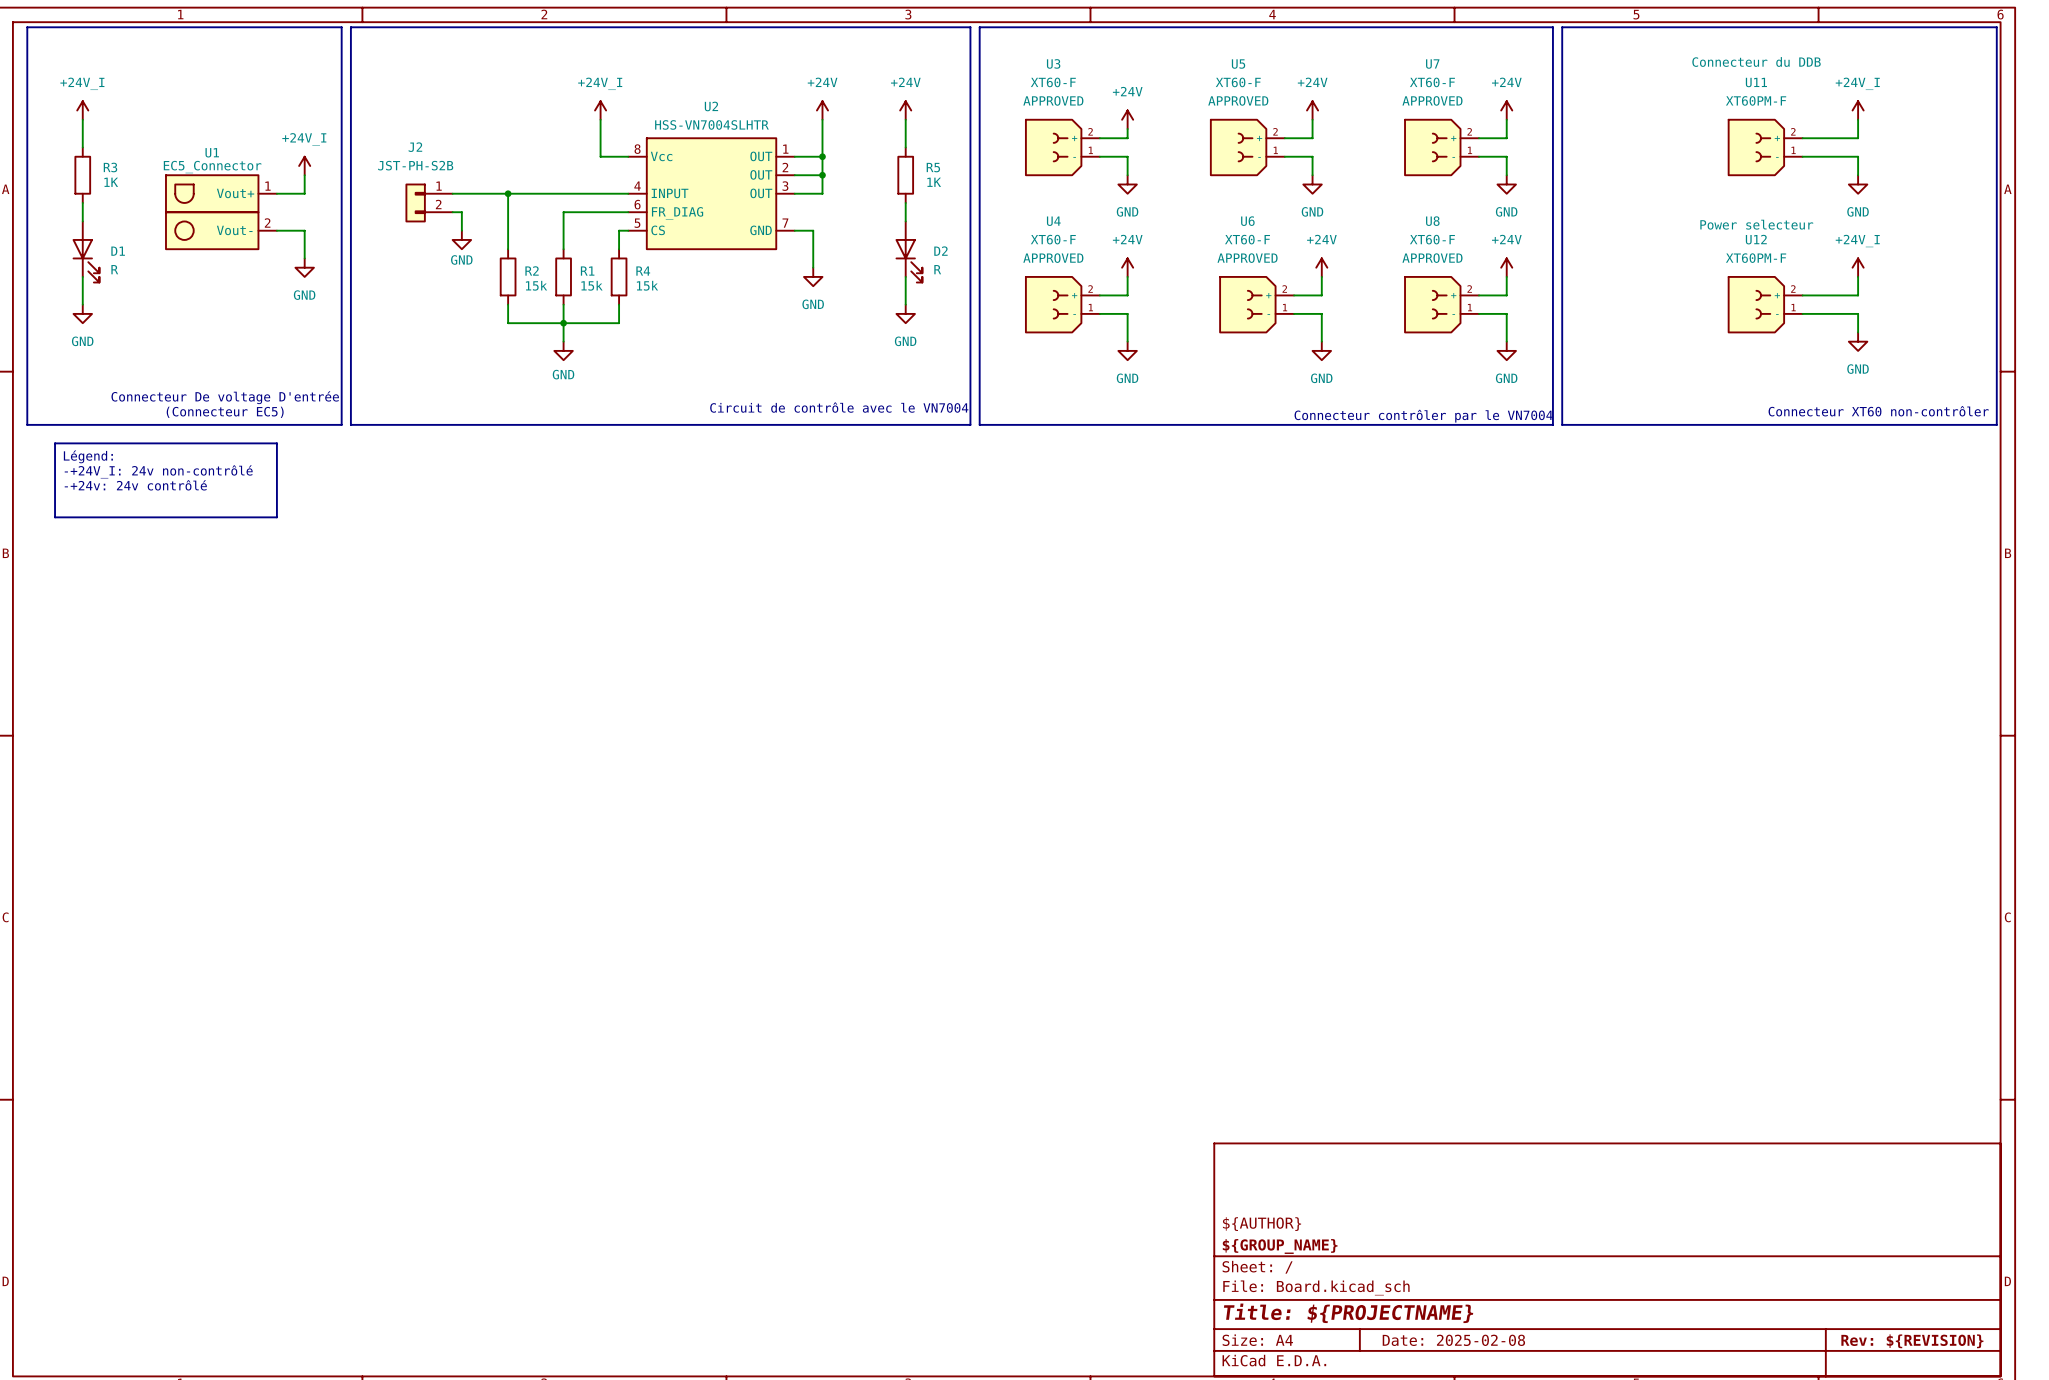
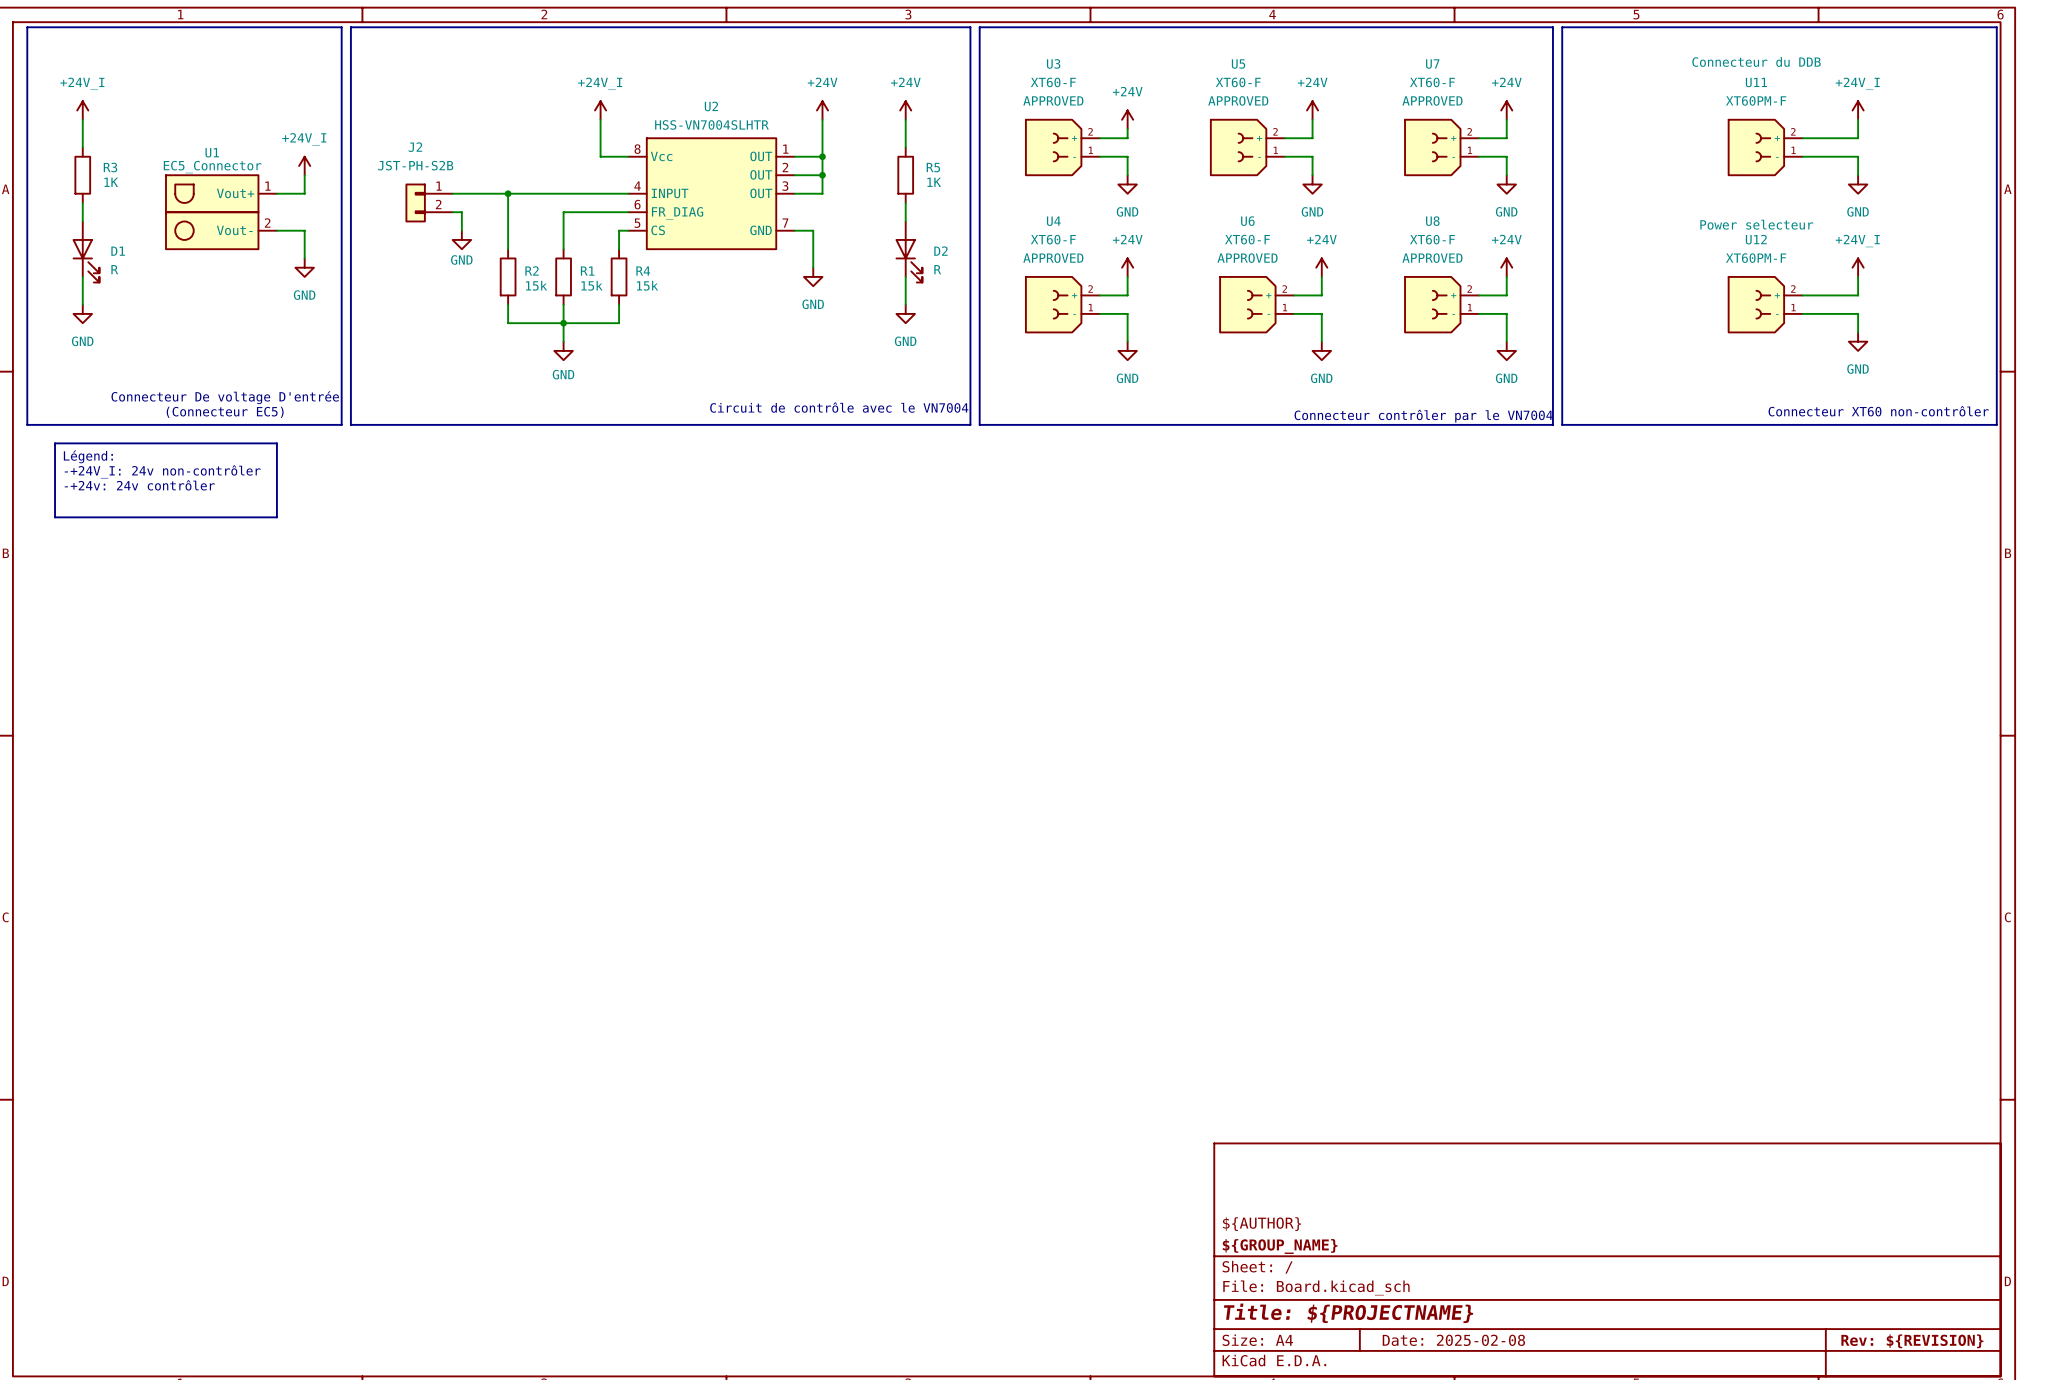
text: -+24V_I: 24v non-contrôlé (158, 471) -> -+24V_I: 24v non-contrôler (162, 471)
text: -+24v: 24v contrôlé (135, 485) -> -+24v: 24v contrôler (139, 485)

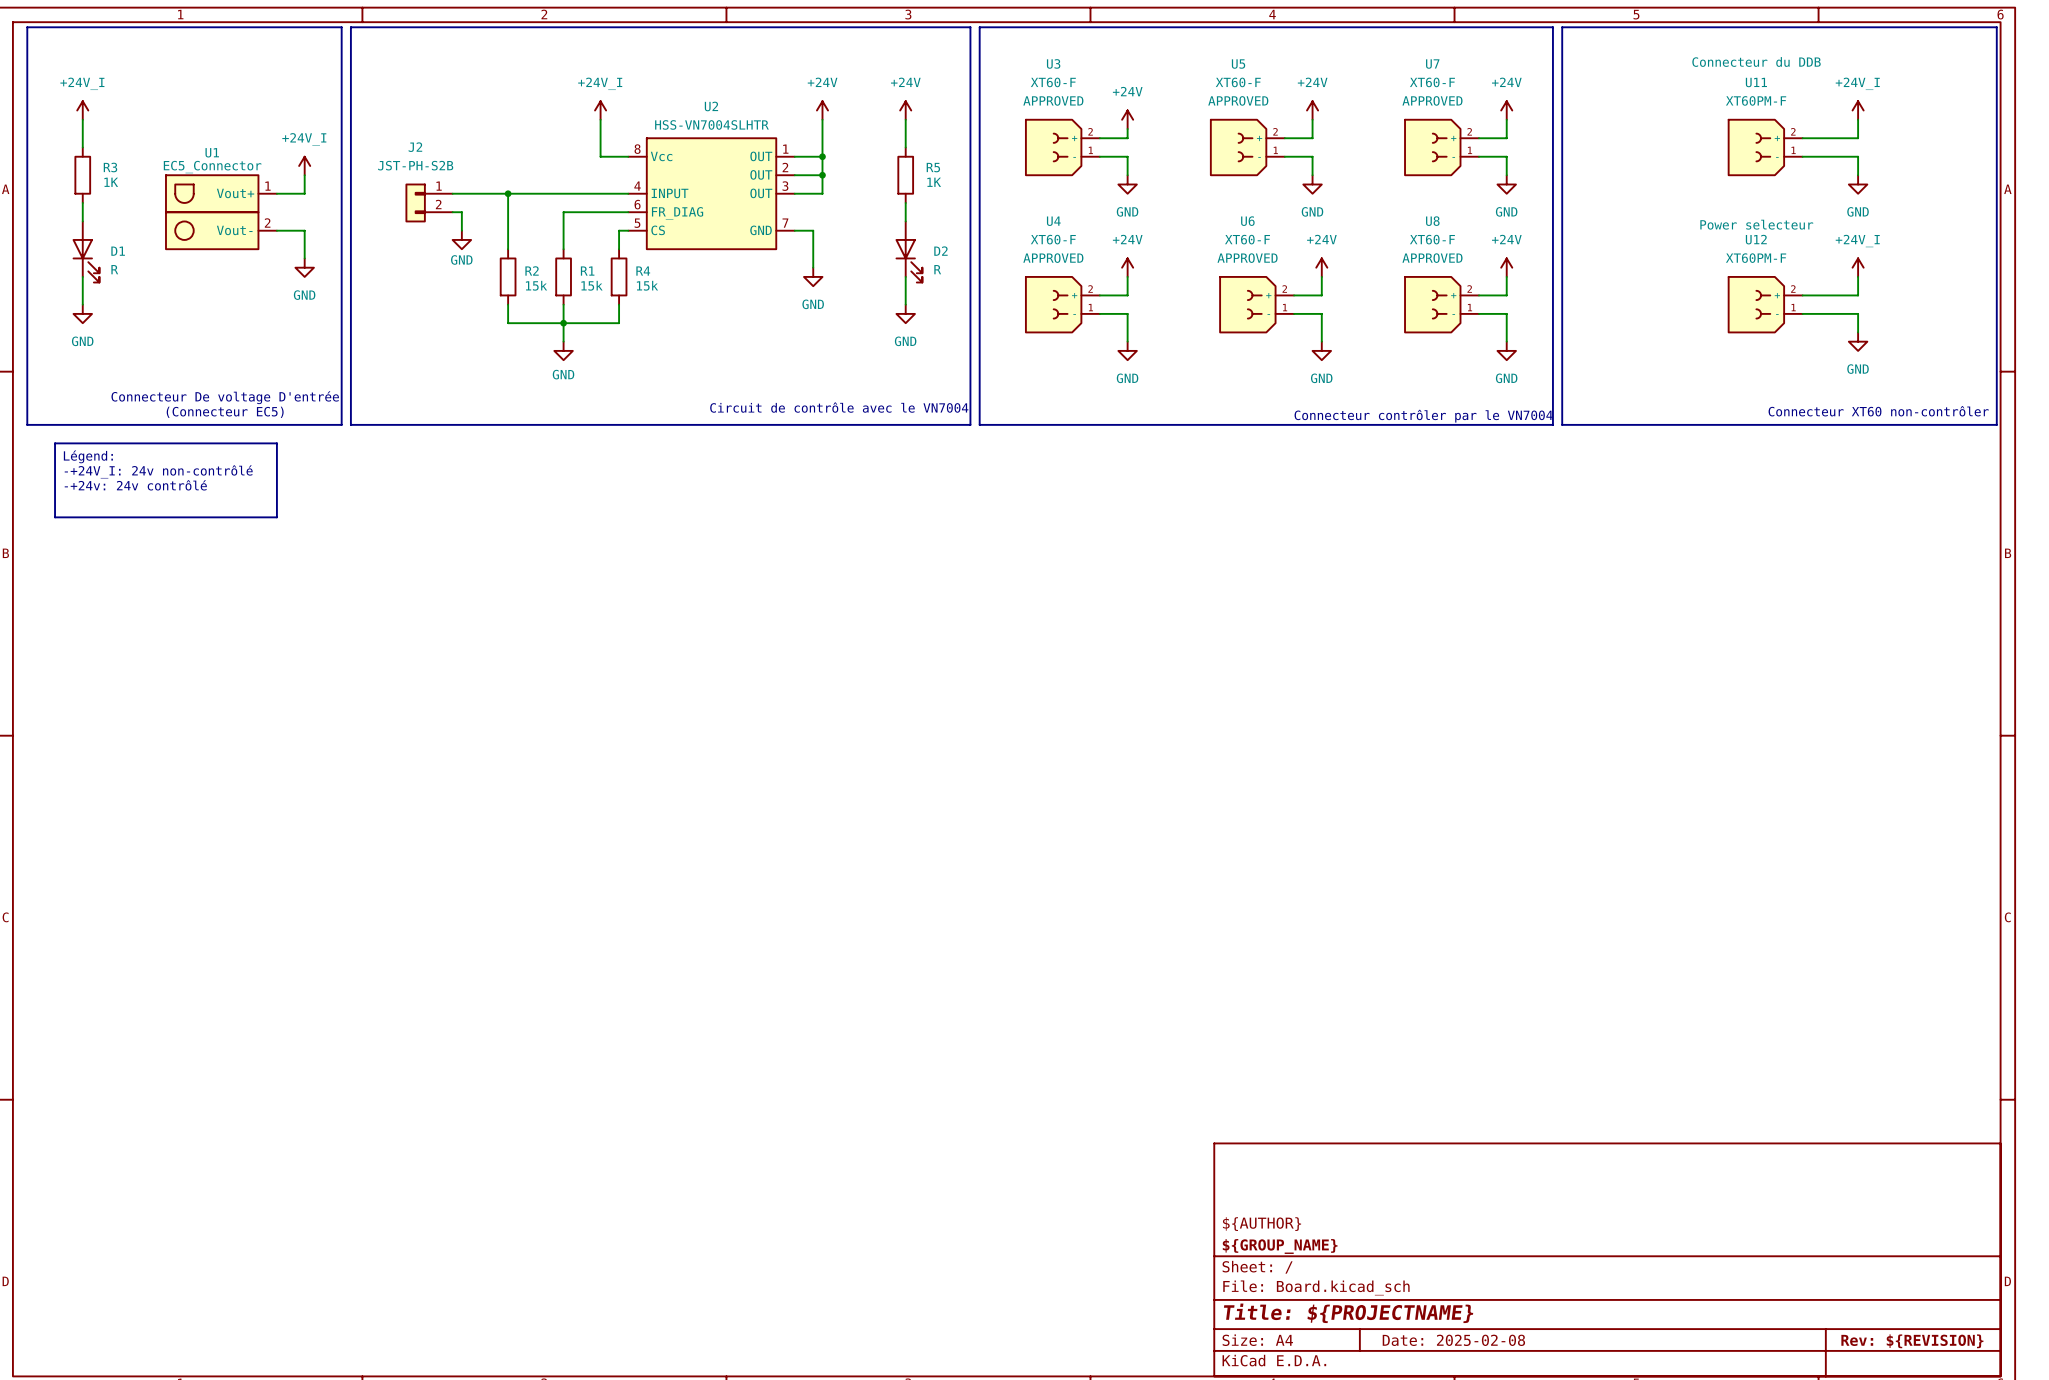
text: -+24V_I: 24v non-contrôler (162, 471) -> -+24V_I: 24v non-contrôlé (158, 471)
text: -+24v: 24v contrôler (139, 485) -> -+24v: 24v contrôlé (135, 485)

